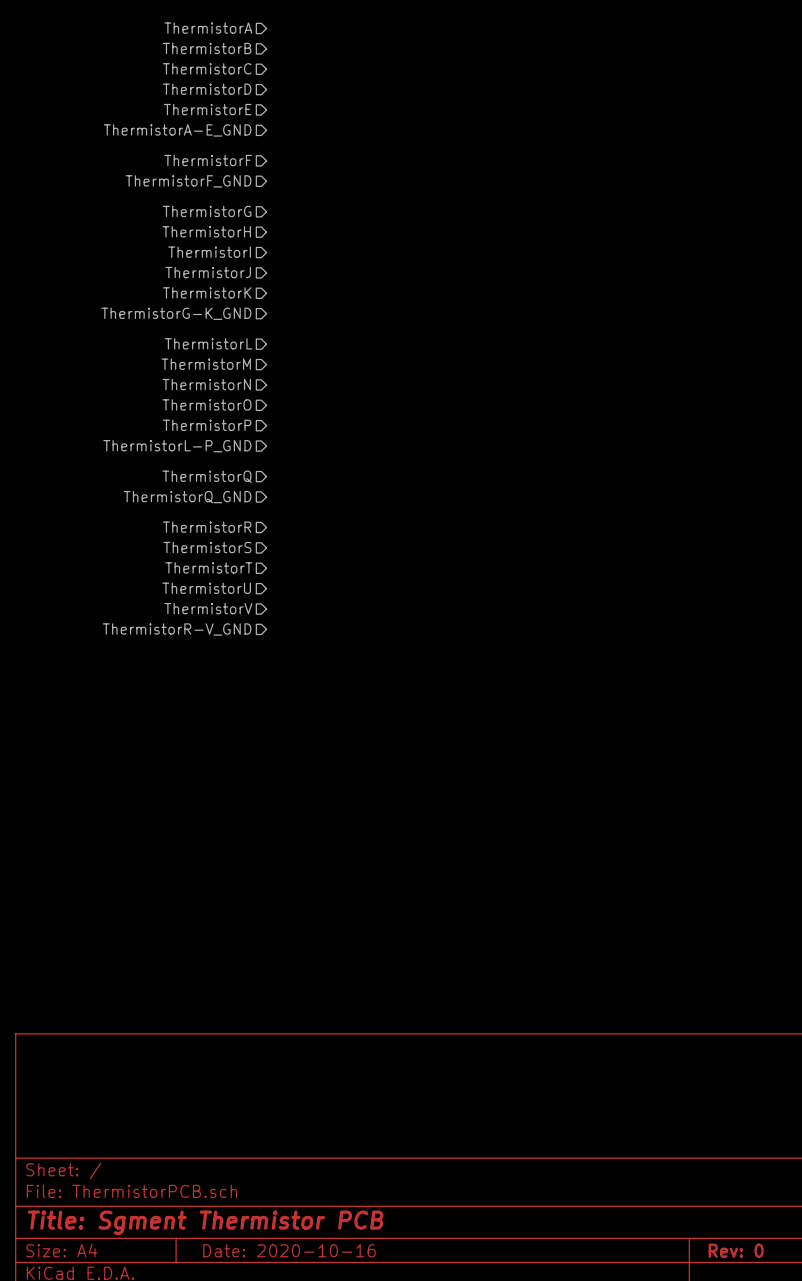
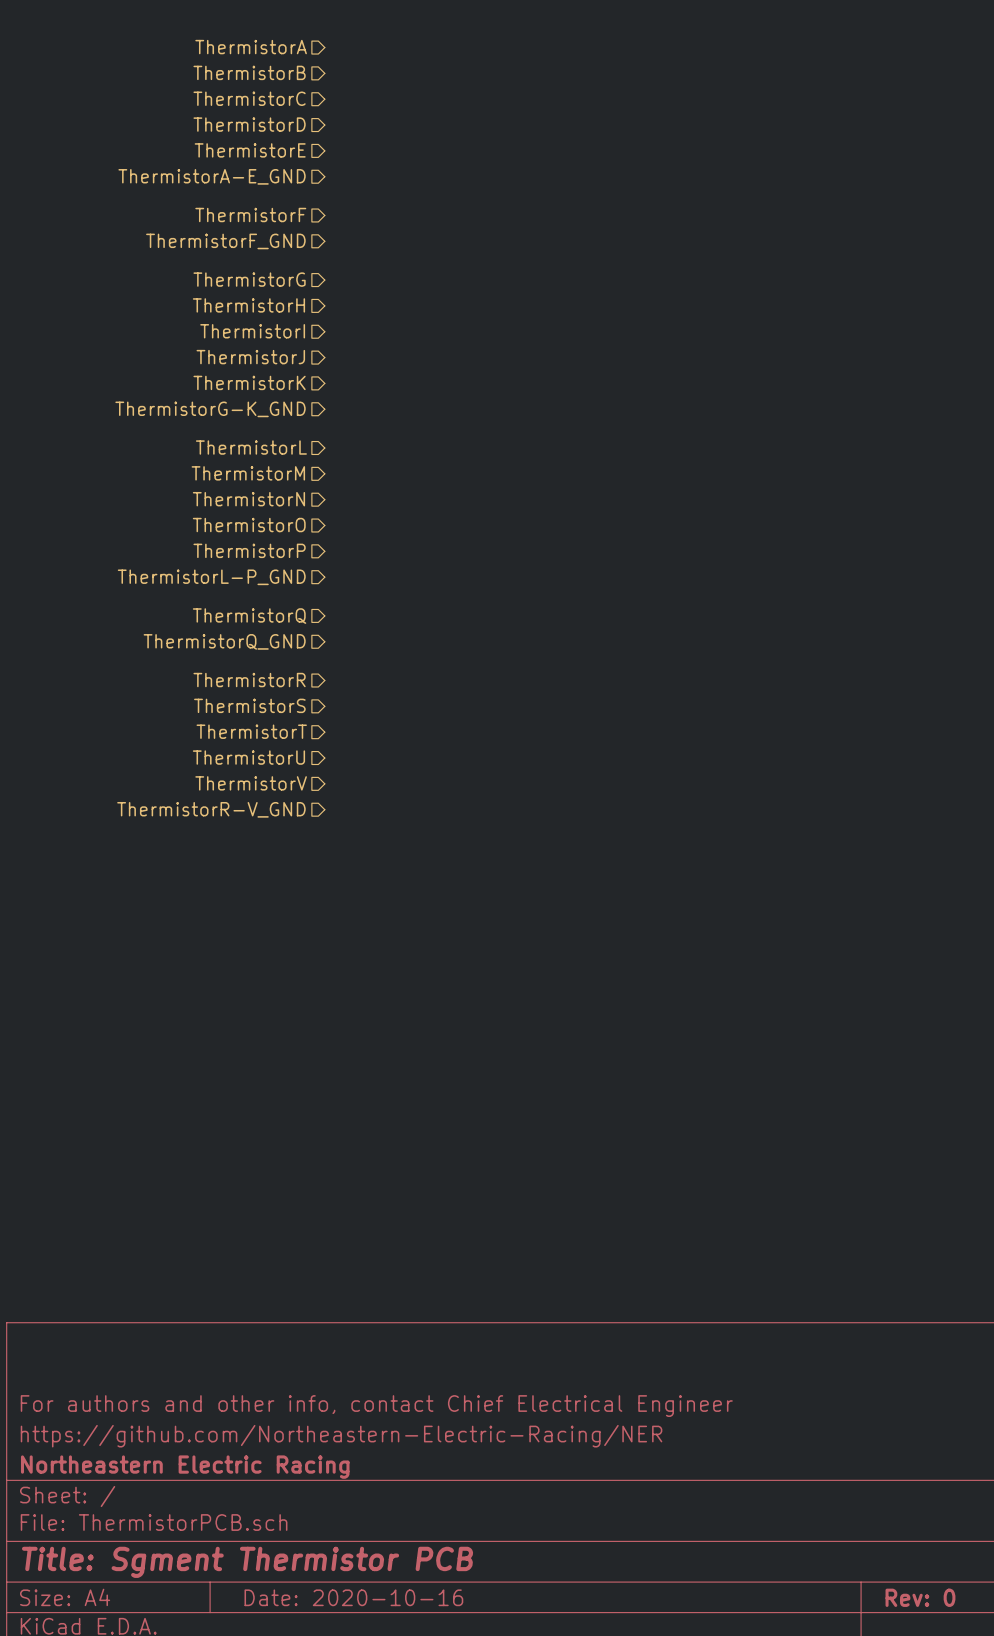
title block: none -> For authors and other info, contact Chief Electrical Engineer (376, 1406)
title block: none -> https://github.com/Northeastern-Electric-Racing/NER (341, 1436)
title block: none -> Northeastern Electric Racing (185, 1467)

